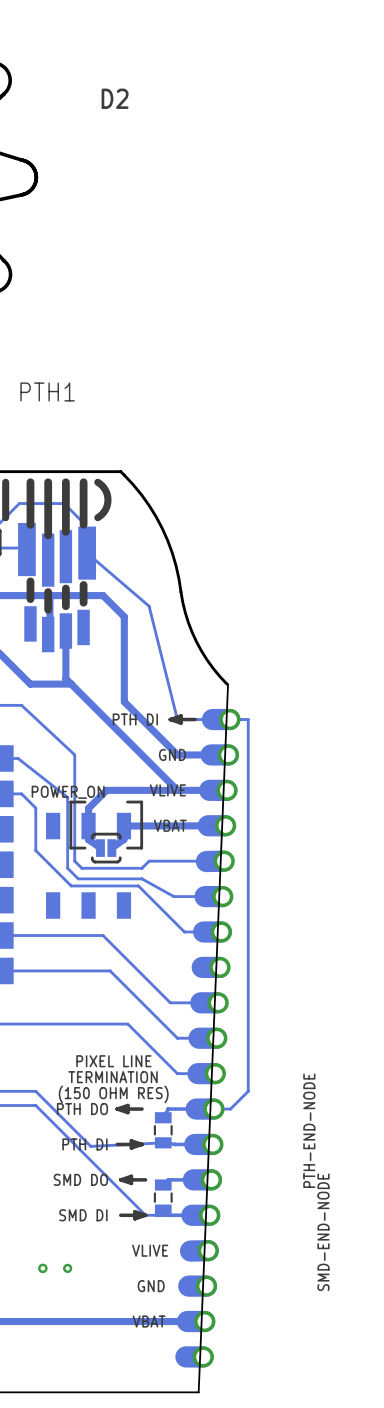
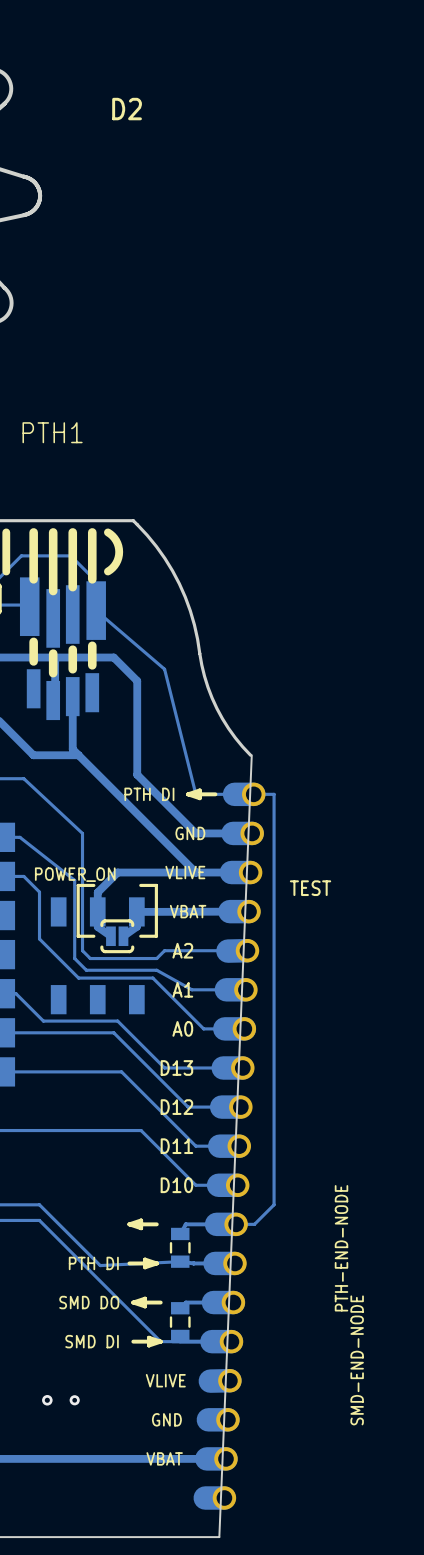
text: none -> TEST (310, 888)
text: none -> A2 (182, 950)
text: none -> A1 (182, 989)
track: none -> (12, 993) (16, 993) (43, 1021) (117, 1021) (164, 1067) (242, 1067)
text: none -> A0 (182, 1028)
text: none -> D13 (176, 1067)
text: none -> D12 (176, 1107)
text: none -> D11 (176, 1146)
text: PIXEL LINE (113, 1061) -> none
text: none -> D10 (176, 1185)
text: TERMINATION (113, 1077) -> none
text: (150 OHM RES) (113, 1094) -> none
text: PTH DO (82, 1109) -> none

